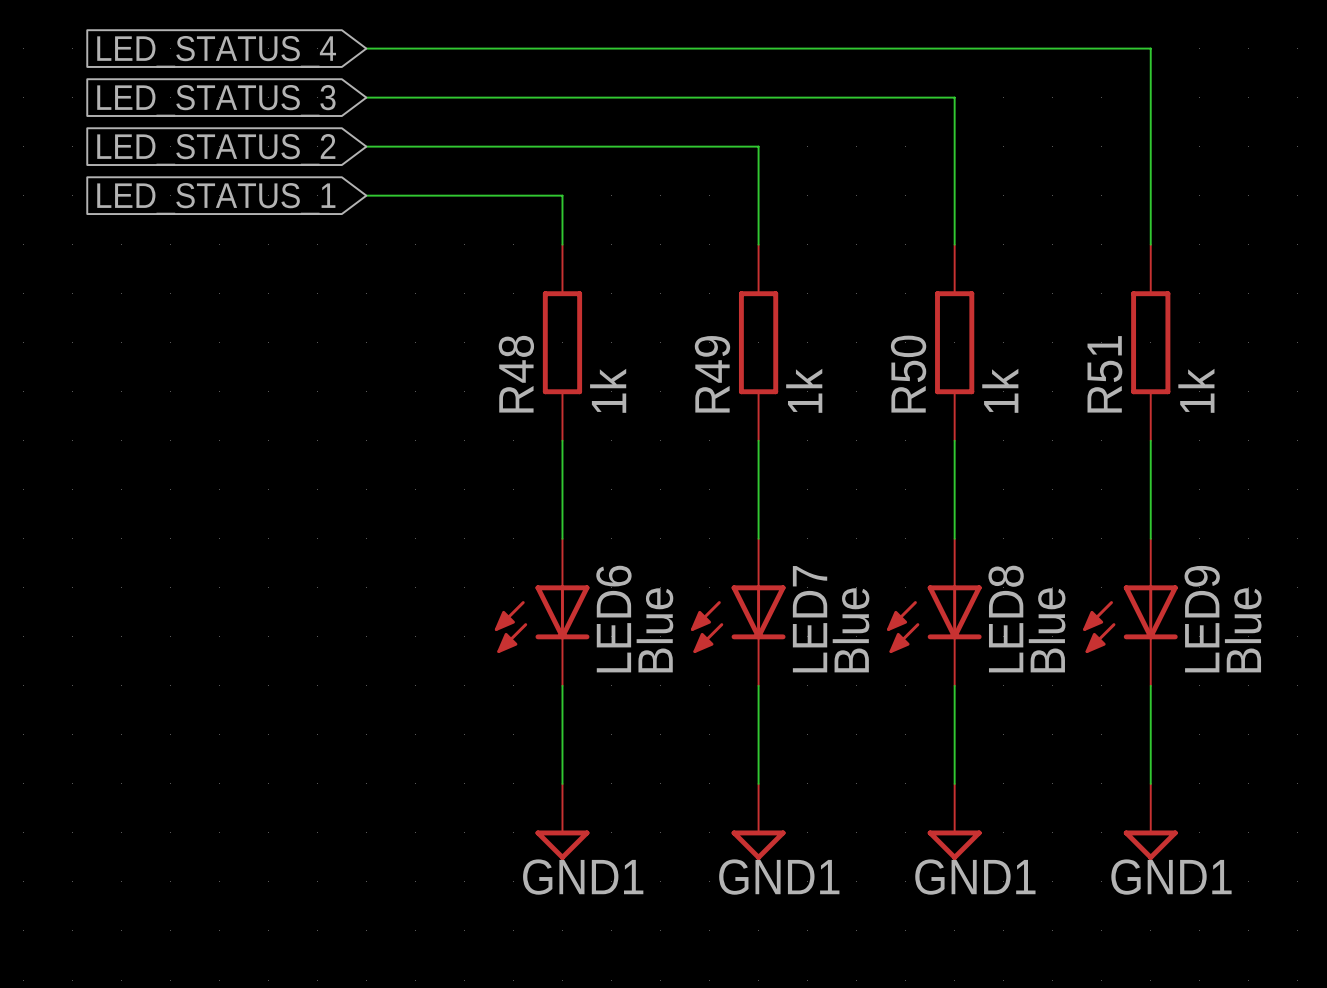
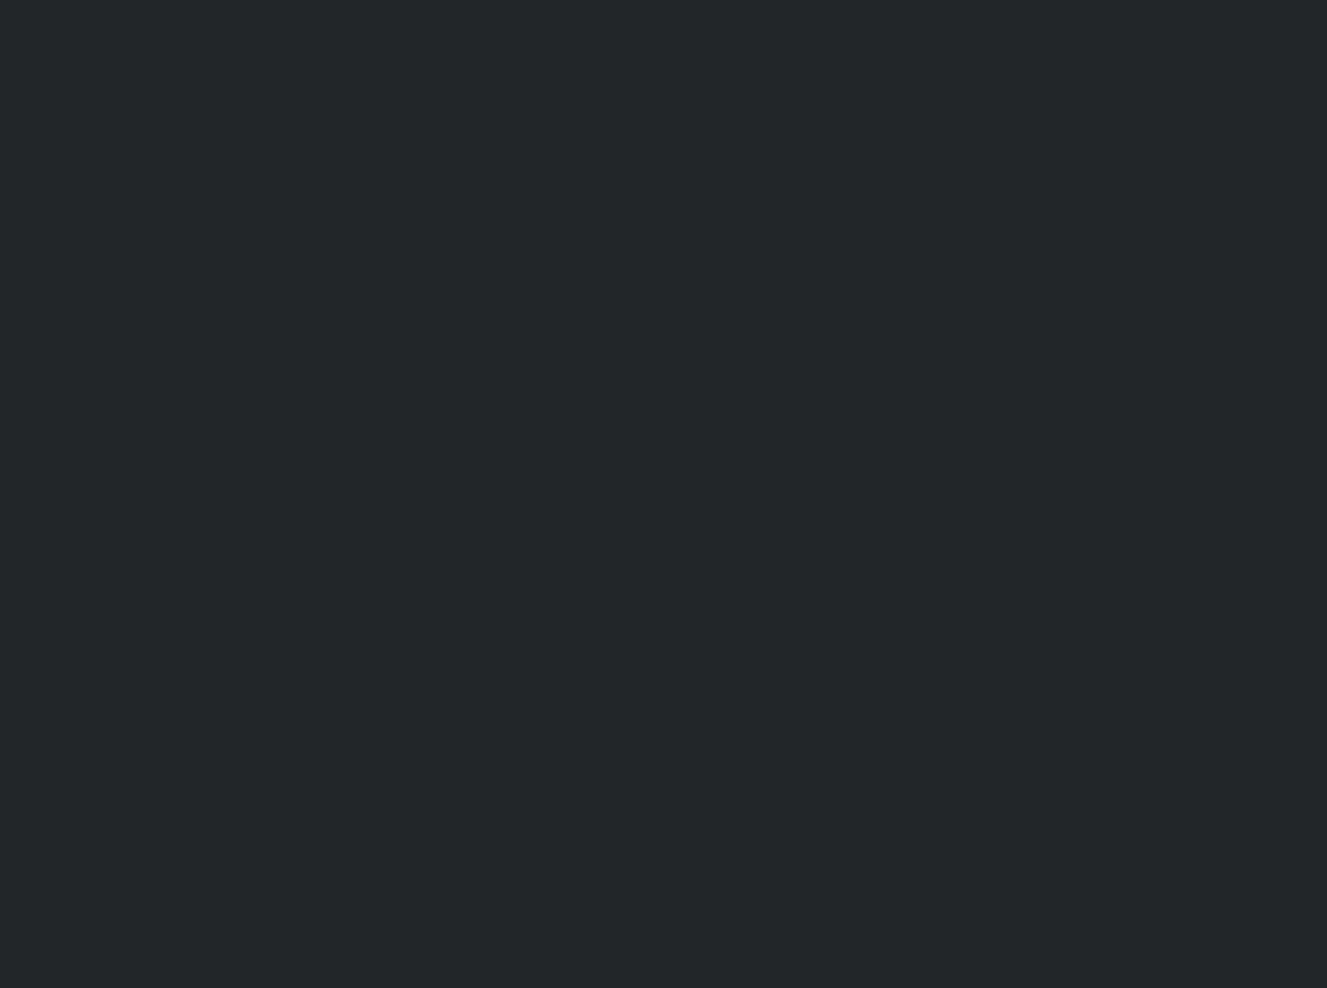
wire: (366, 48) (1150, 48) (1150, 244) -> none
global label: LED_STATUS_4 (216, 51) -> none
wire: (366, 97) (954, 97) (954, 244) -> none
global label: LED_STATUS_3 (216, 100) -> none
wire: (366, 146) (758, 146) (758, 244) -> none
global label: LED_STATUS_2 (216, 149) -> none
wire: (366, 195) (562, 195) (562, 244) -> none
global label: LED_STATUS_1 (216, 199) -> none
R48: 1k (562, 342) -> none
R49: 1k (758, 342) -> none
R50: 1k (954, 342) -> none
R51: 1k (1150, 342) -> none
wire: (562, 440) (562, 538) -> none
wire: (758, 440) (758, 538) -> none
wire: (954, 440) (954, 538) -> none
wire: (1150, 440) (1150, 538) -> none
LED6: Blue (542, 612) -> none
LED7: Blue (738, 612) -> none
LED8: Blue (934, 612) -> none
LED9: Blue (1130, 612) -> none
wire: (562, 685) (562, 783) -> none
wire: (758, 685) (758, 783) -> none
wire: (954, 685) (954, 783) -> none
wire: (1150, 685) (1150, 783) -> none
power symbol: GND1 (562, 821) -> none
power symbol: GND1 (758, 821) -> none
power symbol: GND1 (954, 821) -> none
power symbol: GND1 (1150, 821) -> none

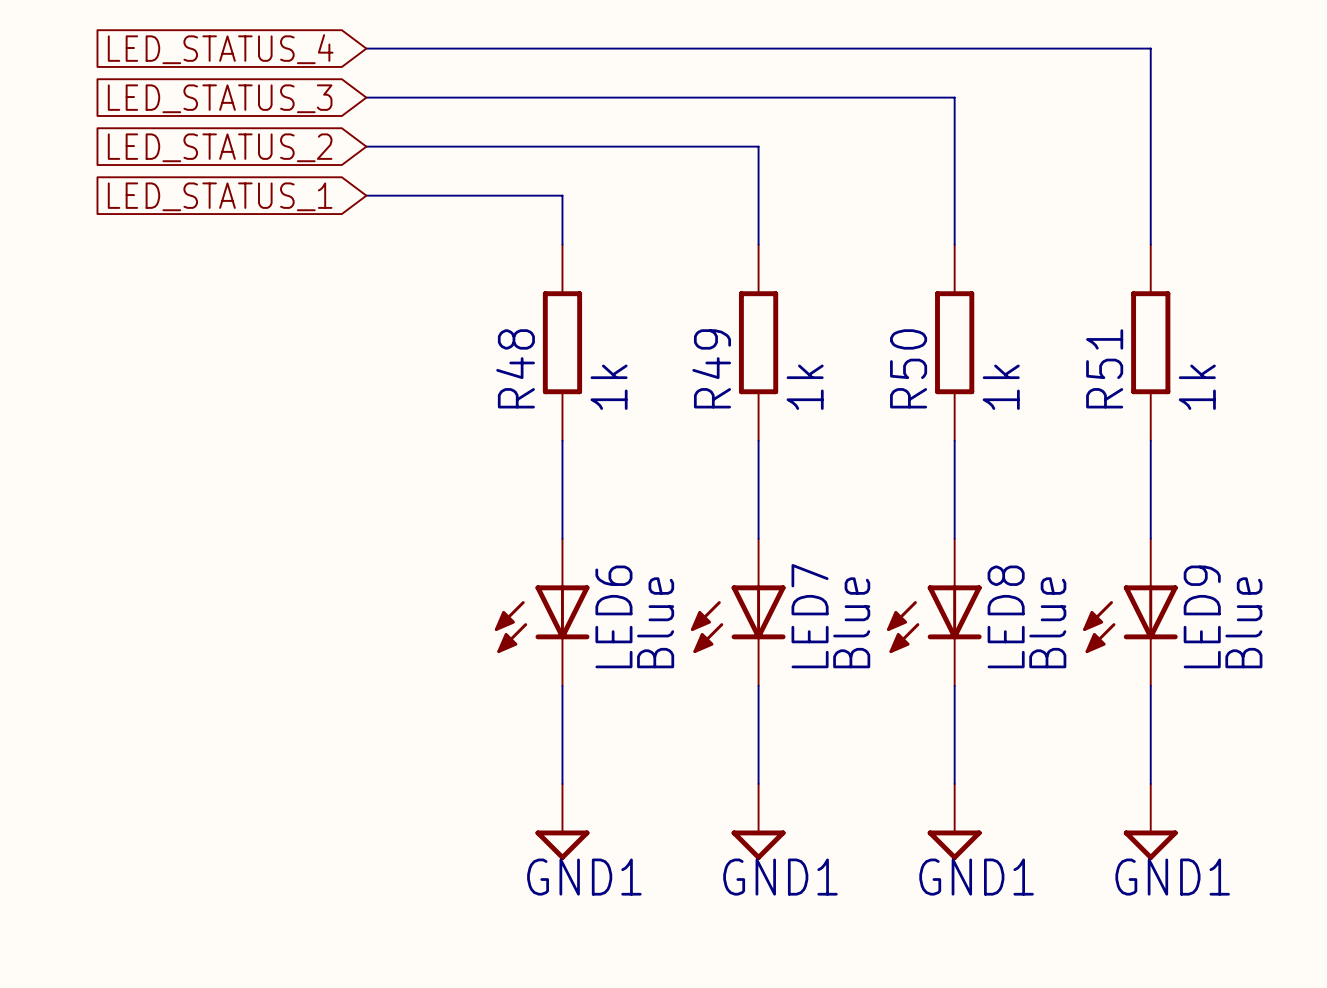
wire: none -> (366, 48) (1150, 48) (1150, 244)
global label: none -> LED_STATUS_4 (220, 49)
wire: none -> (366, 97) (954, 97) (954, 244)
global label: none -> LED_STATUS_3 (220, 98)
wire: none -> (366, 146) (758, 146) (758, 244)
global label: none -> LED_STATUS_2 (220, 147)
wire: none -> (366, 195) (562, 195) (562, 244)
global label: none -> LED_STATUS_1 (220, 196)
R48: none -> 1k (562, 342)
R49: none -> 1k (758, 342)
R50: none -> 1k (954, 342)
R51: none -> 1k (1150, 342)
wire: none -> (562, 440) (562, 538)
wire: none -> (758, 440) (758, 538)
wire: none -> (954, 440) (954, 538)
wire: none -> (1150, 440) (1150, 538)
LED6: none -> Blue (542, 612)
LED7: none -> Blue (738, 612)
LED8: none -> Blue (934, 612)
LED9: none -> Blue (1130, 612)
wire: none -> (562, 685) (562, 783)
wire: none -> (758, 685) (758, 783)
wire: none -> (954, 685) (954, 783)
wire: none -> (1150, 685) (1150, 783)
power symbol: none -> GND1 (562, 821)
power symbol: none -> GND1 (758, 821)
power symbol: none -> GND1 (954, 821)
power symbol: none -> GND1 (1150, 821)

